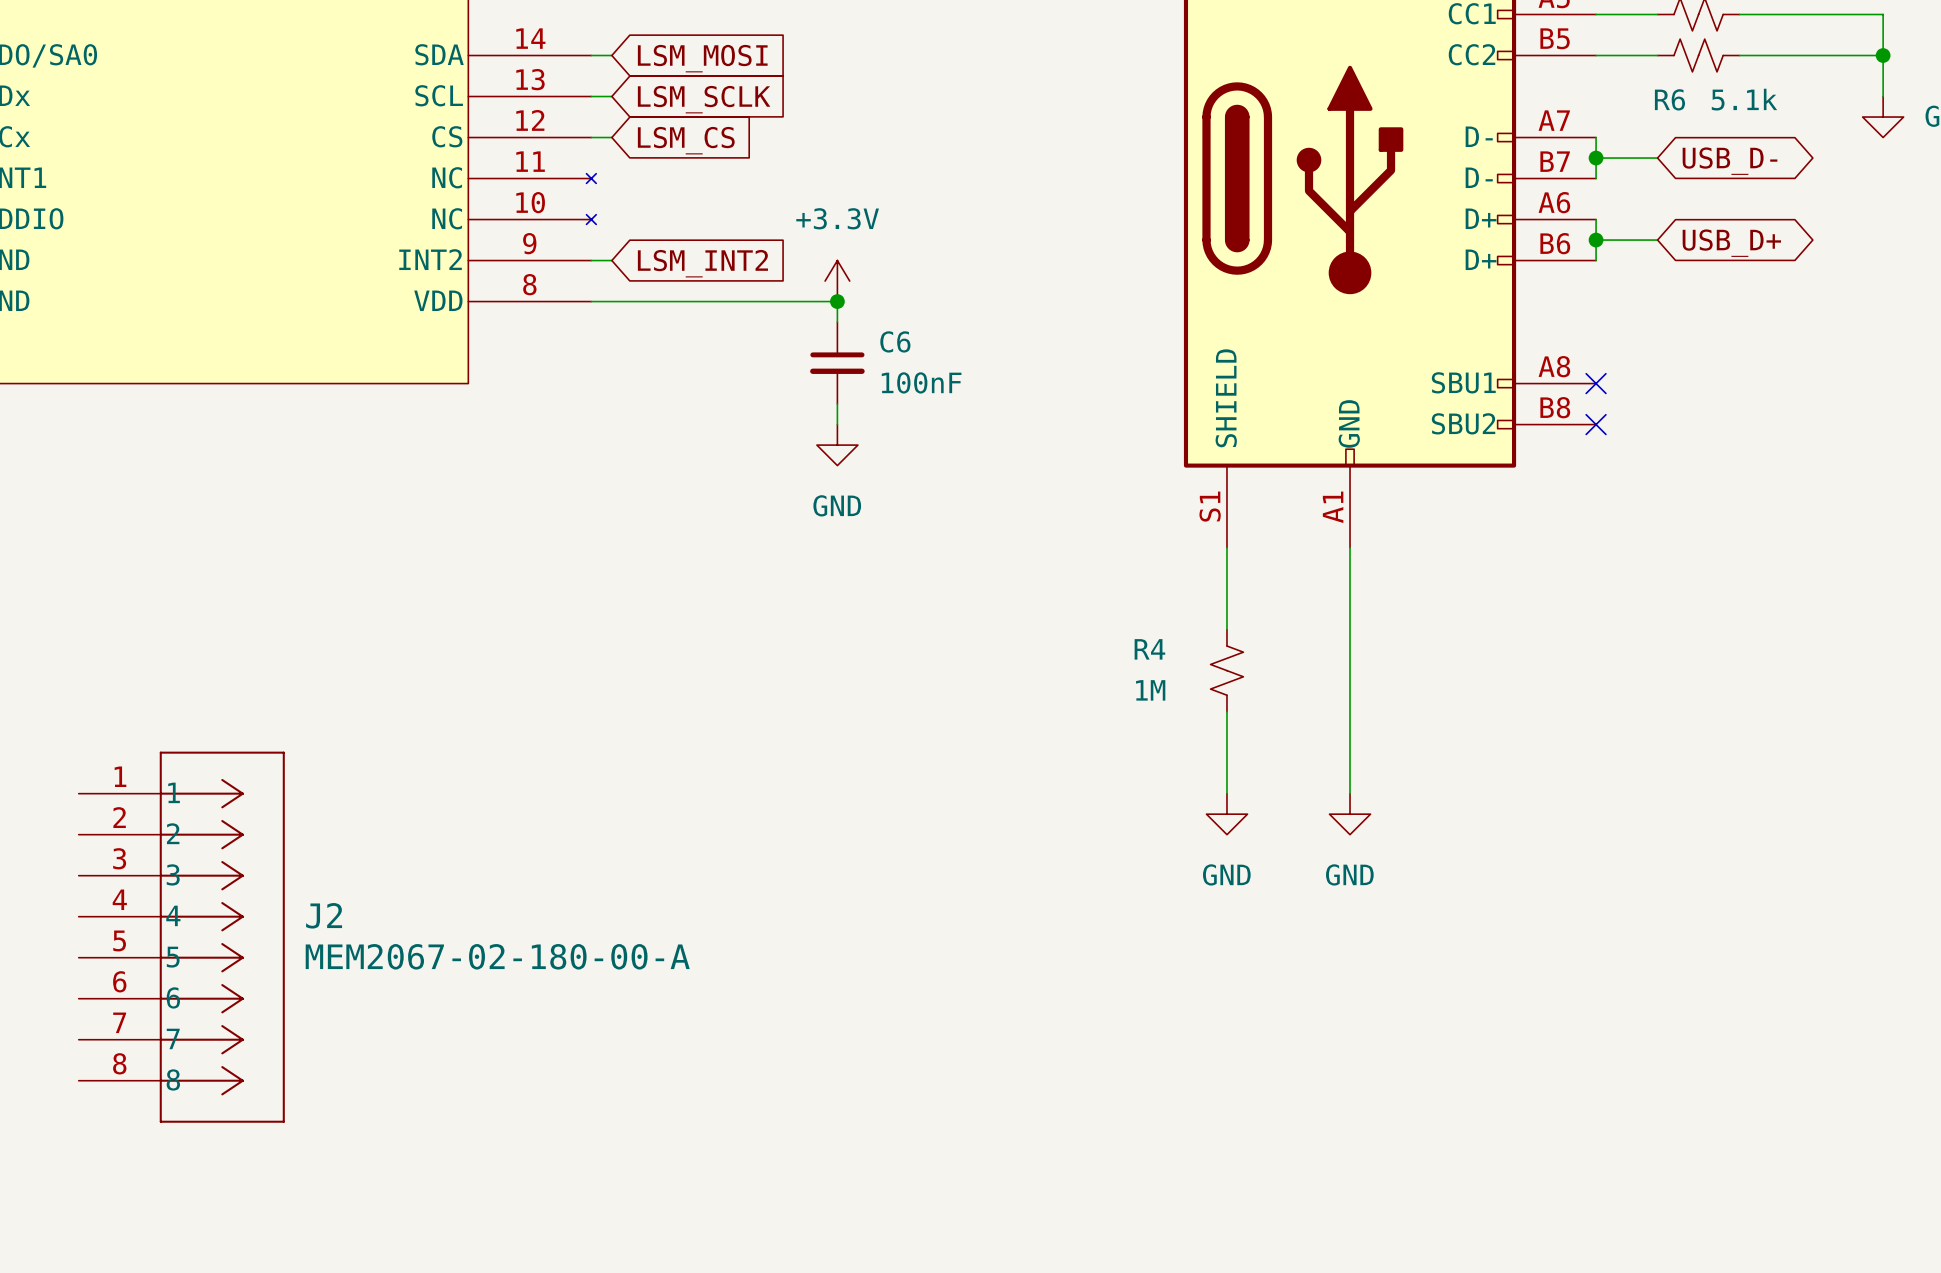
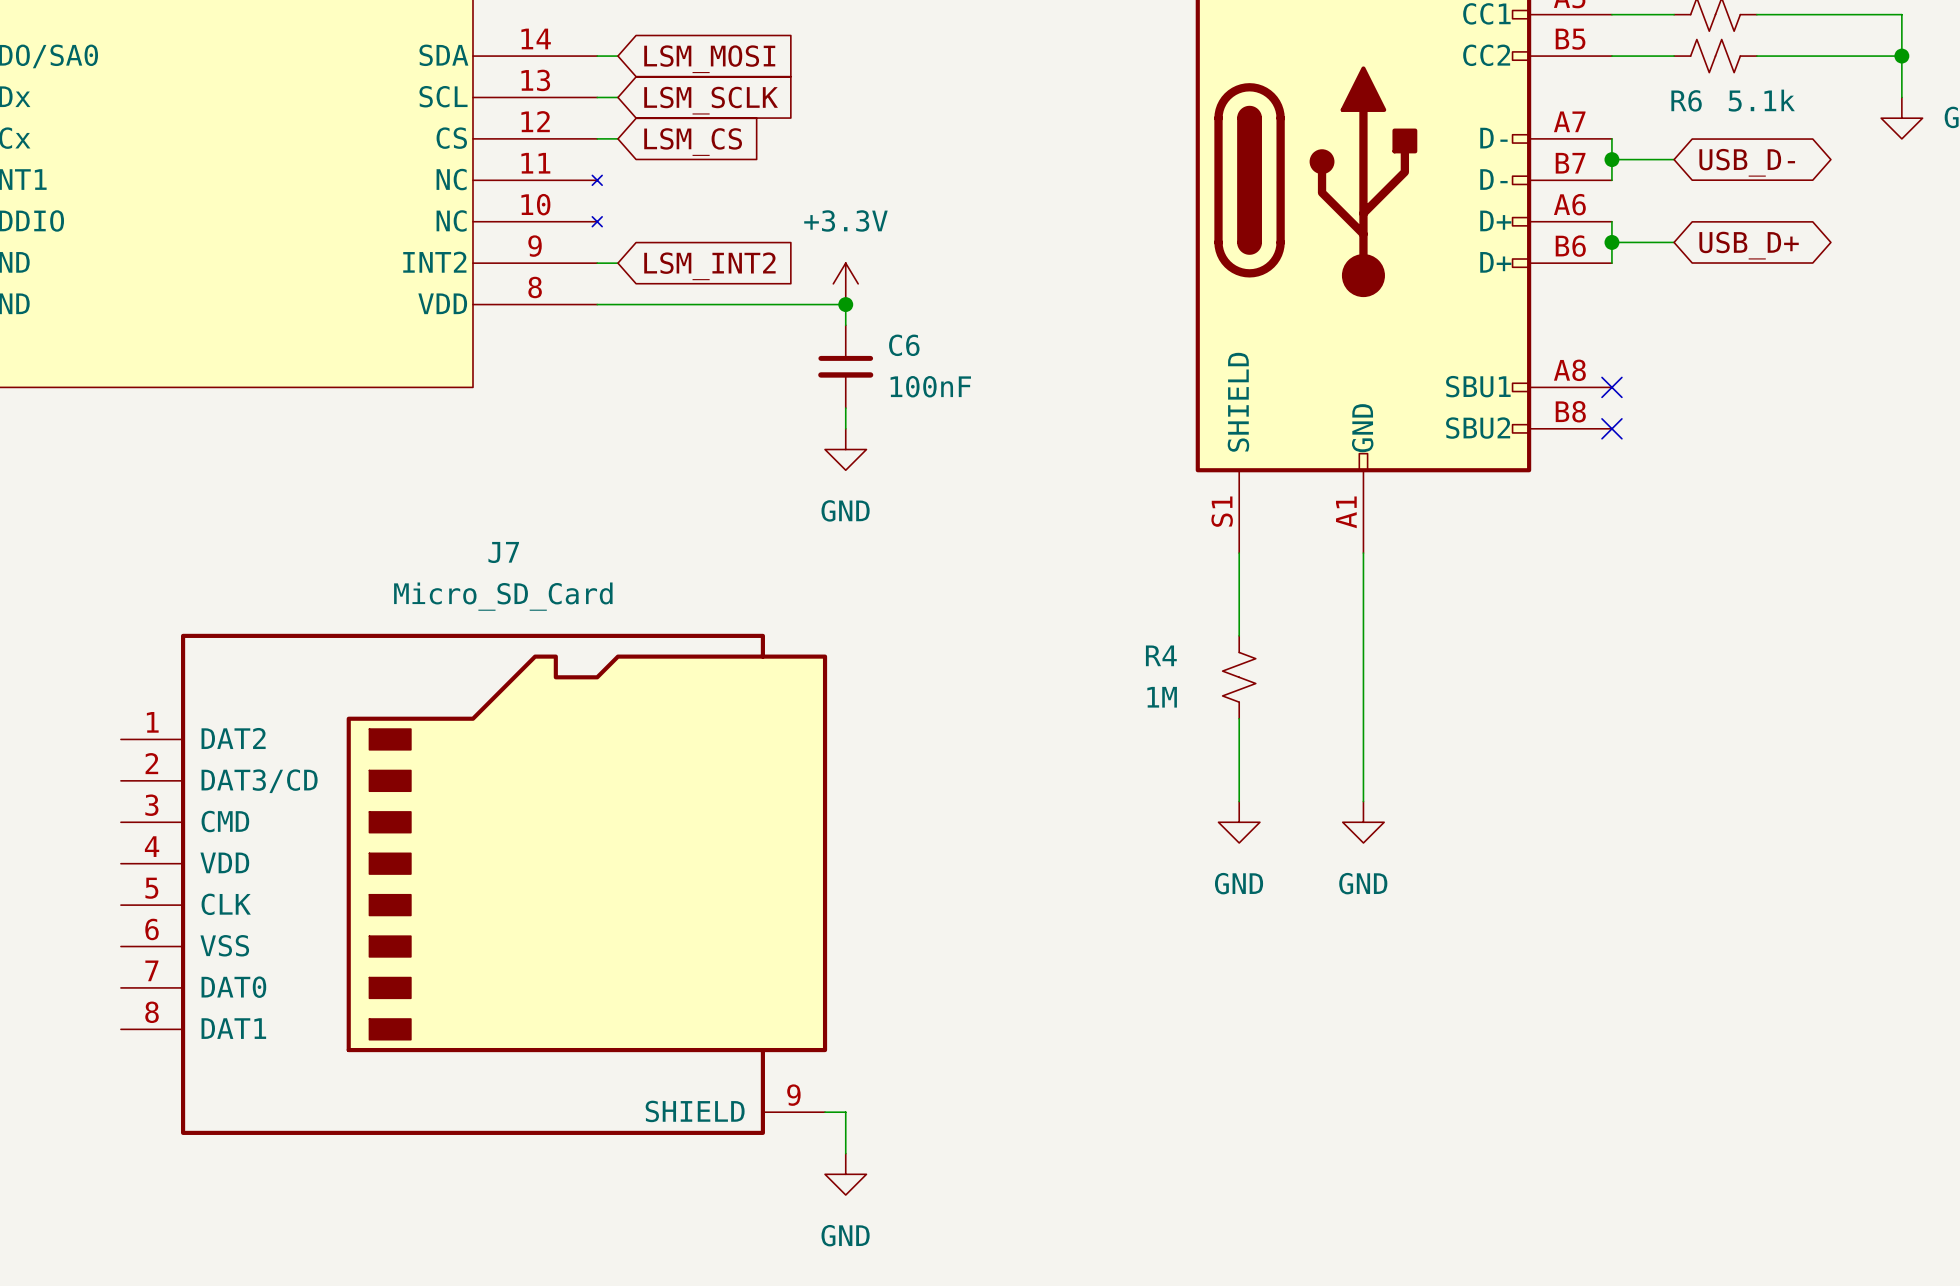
J7: none -> Micro_SD_Card (474, 884)
J2: MEM2067-02-180-00-A (181, 937) -> none
wire: none -> (825, 1112) (845, 1112) (845, 1153)
power symbol: none -> GND (845, 1174)

